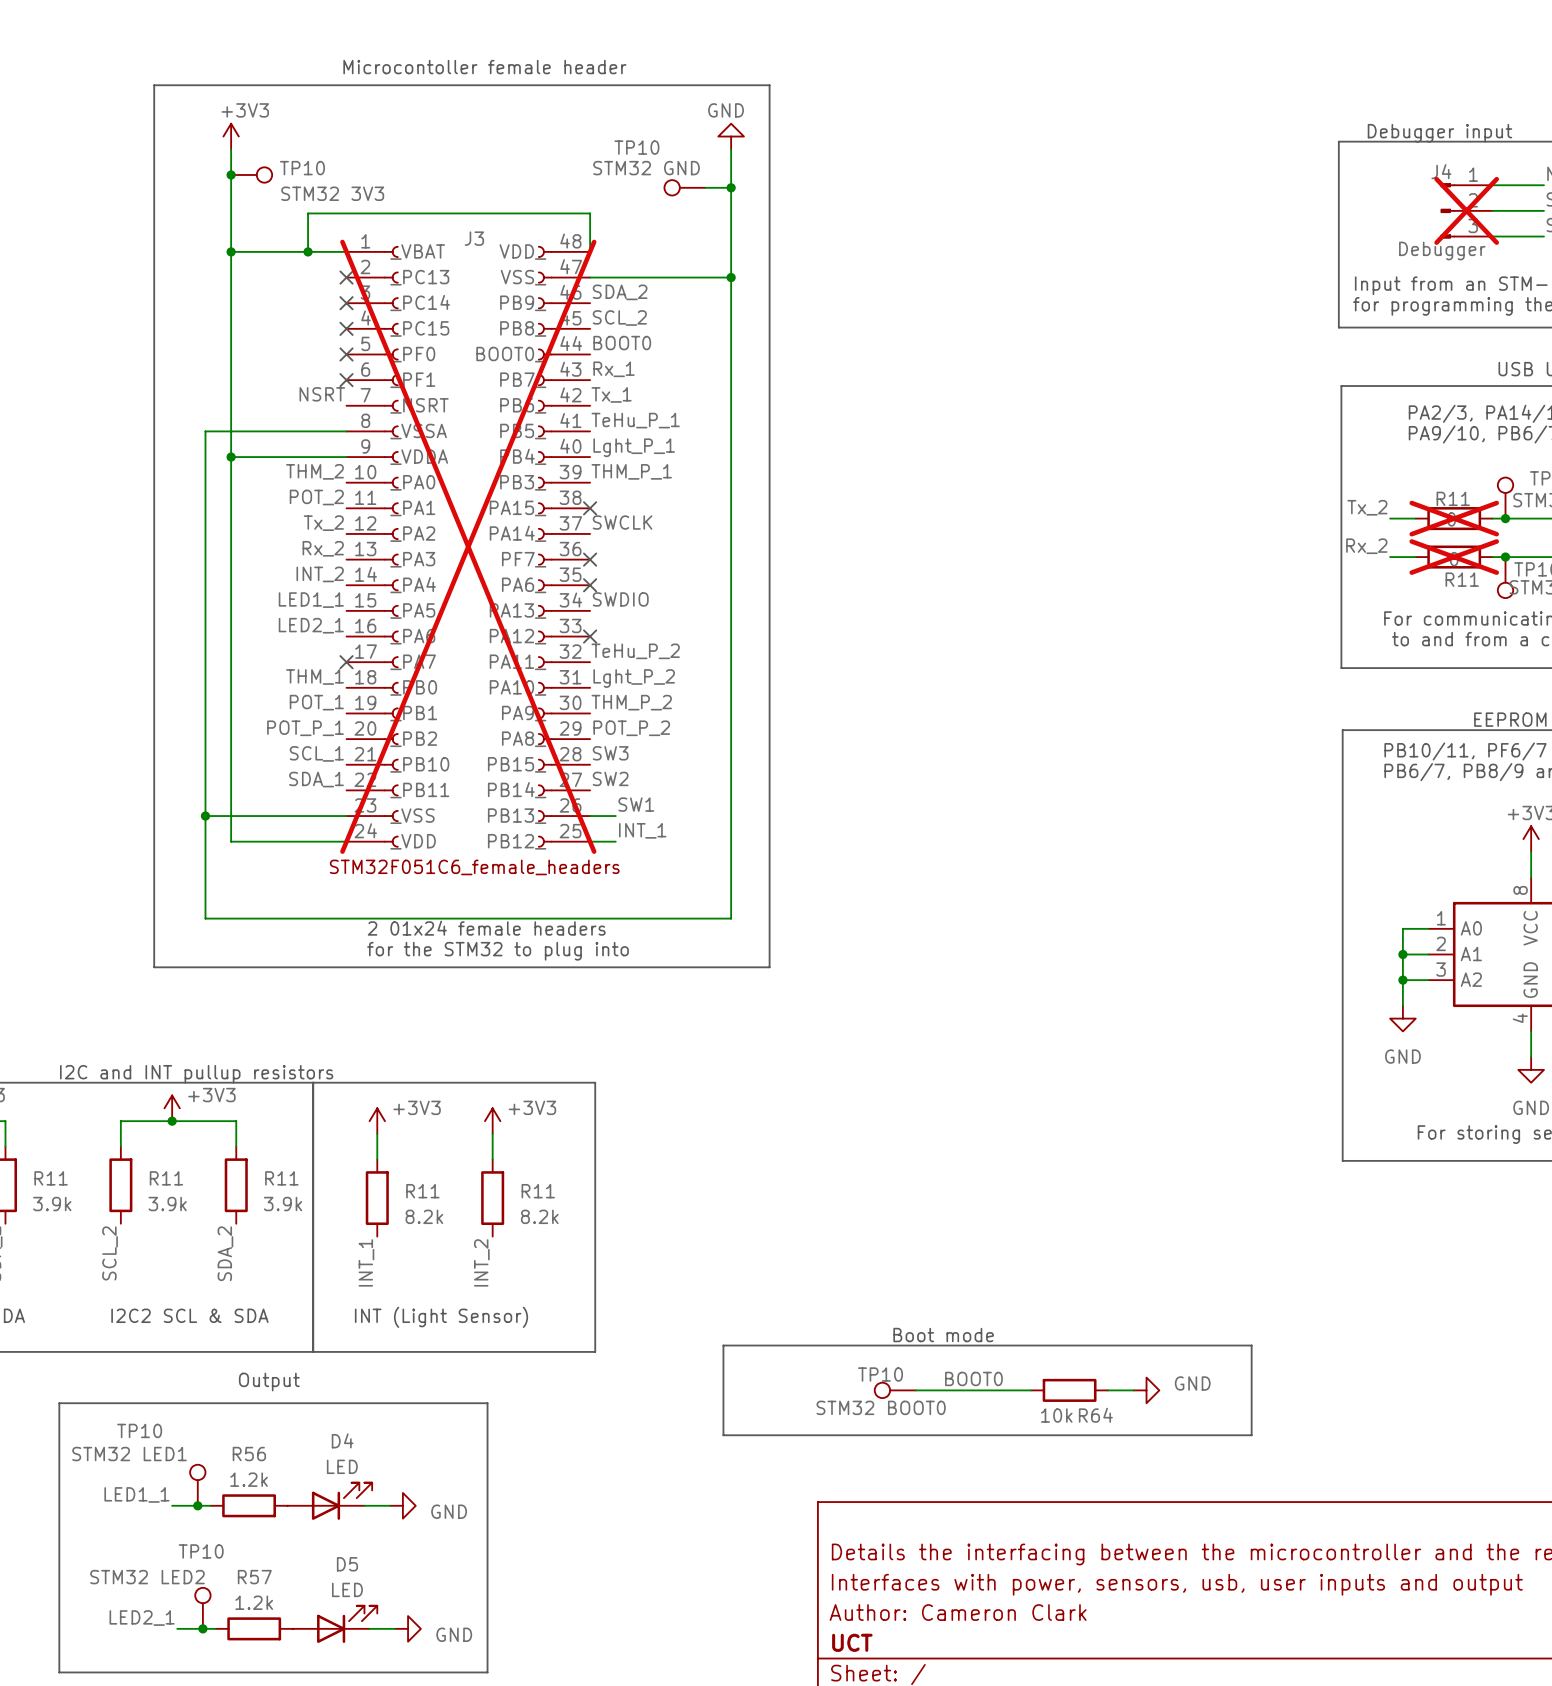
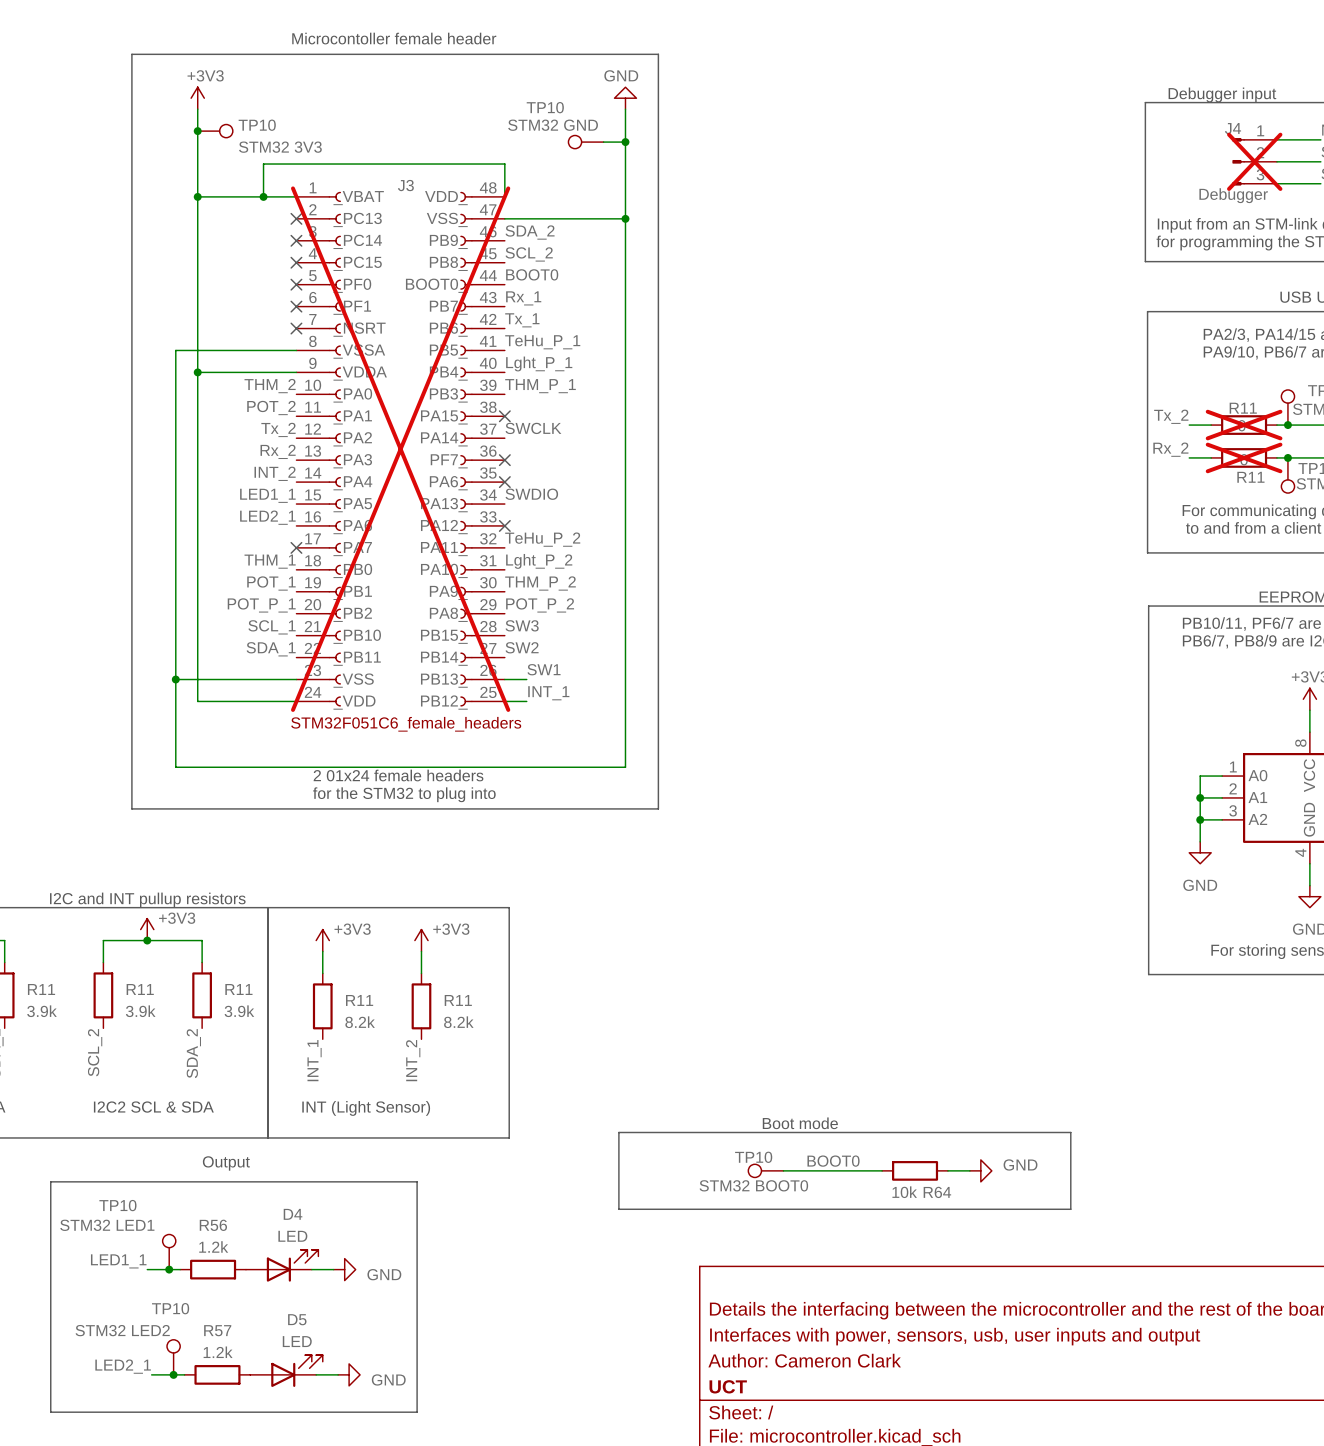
label: NSRT (322, 394) -> none
no-connect mark: none -> (296, 328)

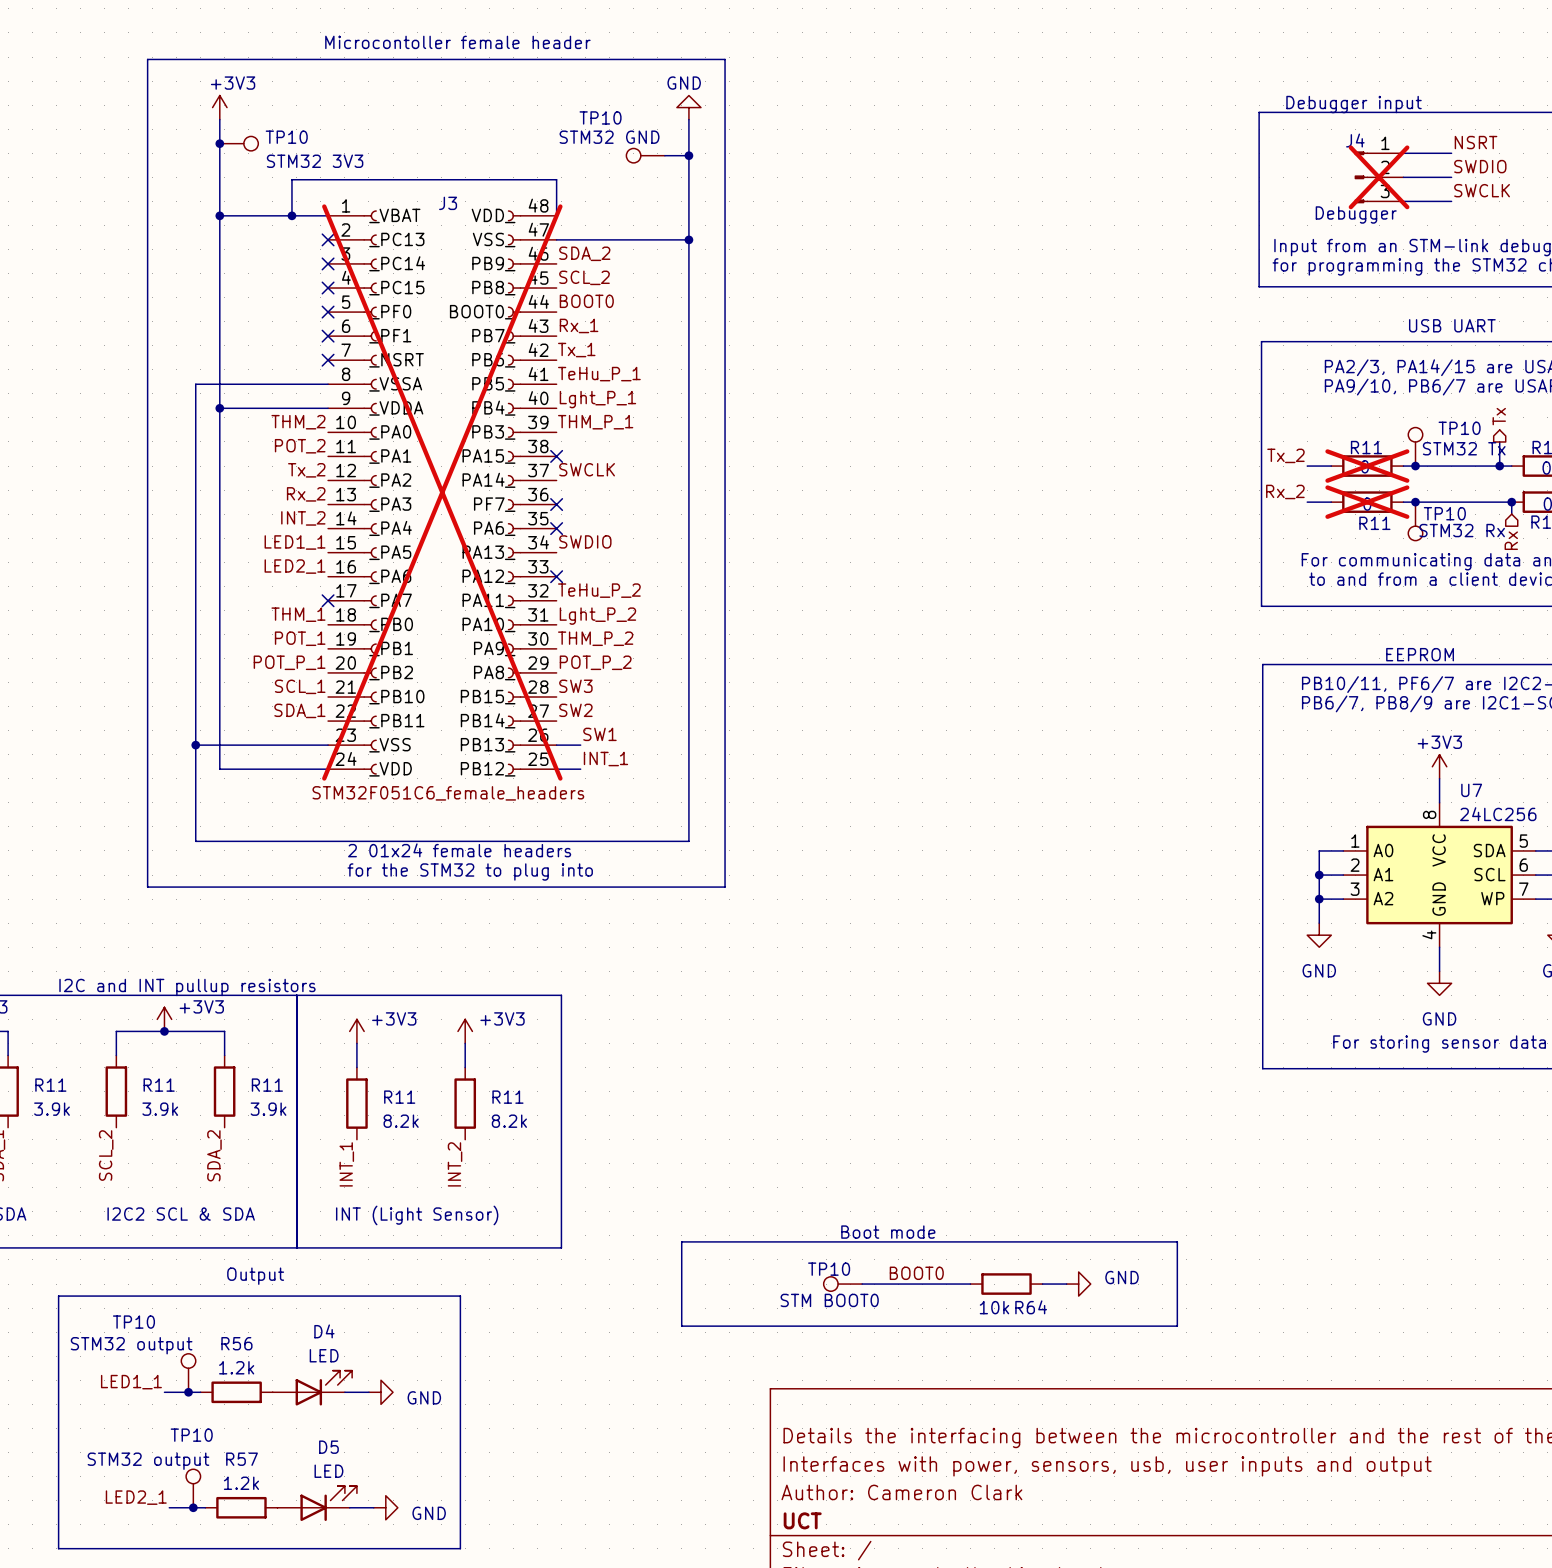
TP10 value: STM32 BOOT0 (753, 1185) -> STM BOOT0 (829, 1300)
TP10 value: STM32 LED1 (107, 1225) -> STM32 output (131, 1345)
TP10 value: STM32 LED2 (122, 1330) -> STM32 output (148, 1461)

